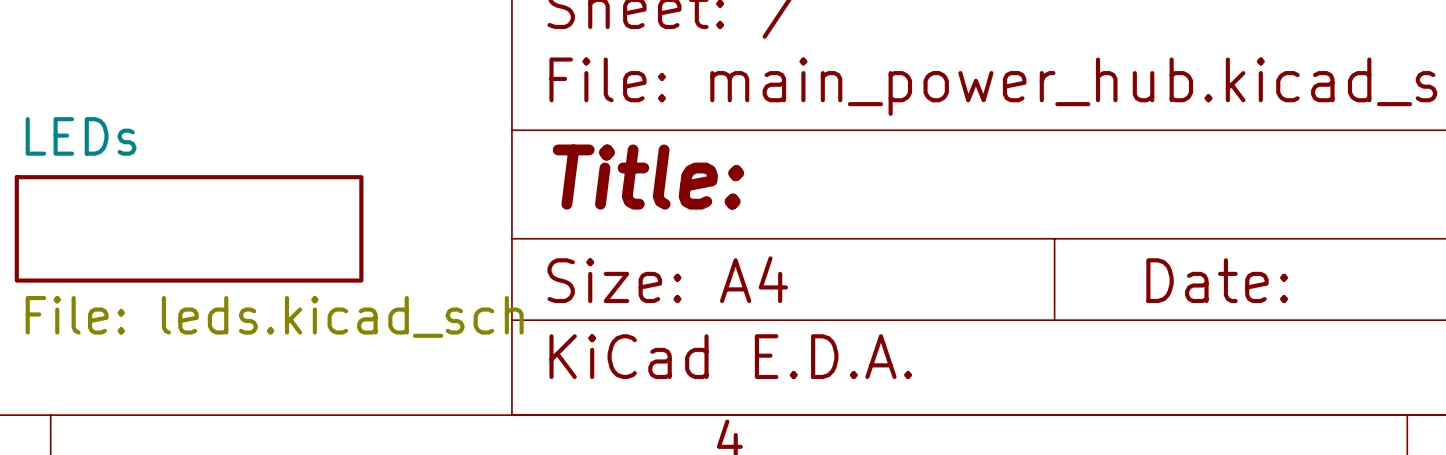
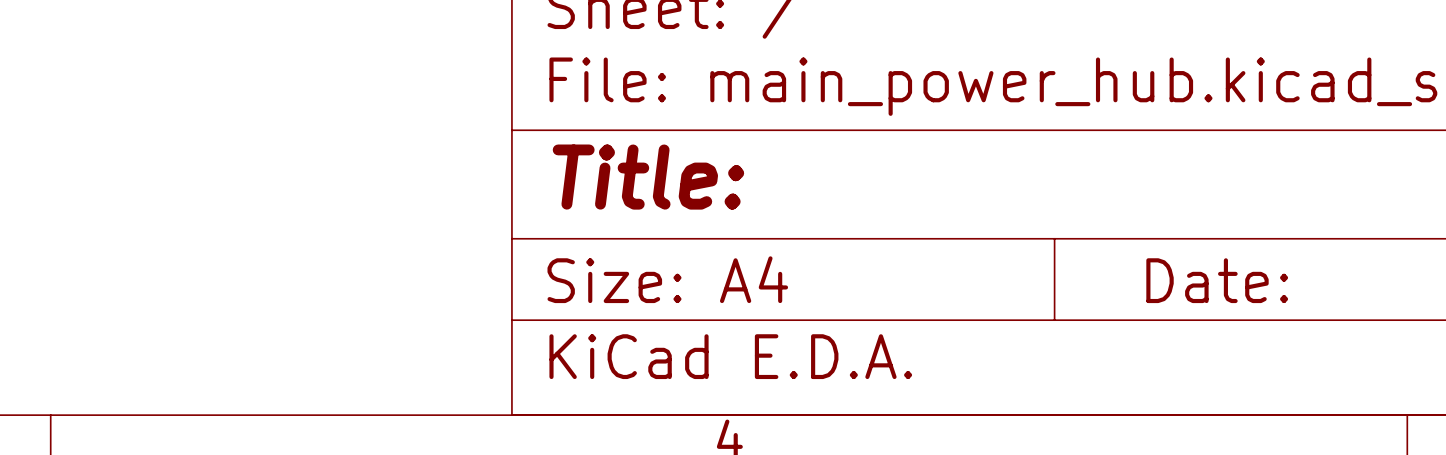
sheet LEDs: File: leds.kicad_sch (189, 228) -> none

